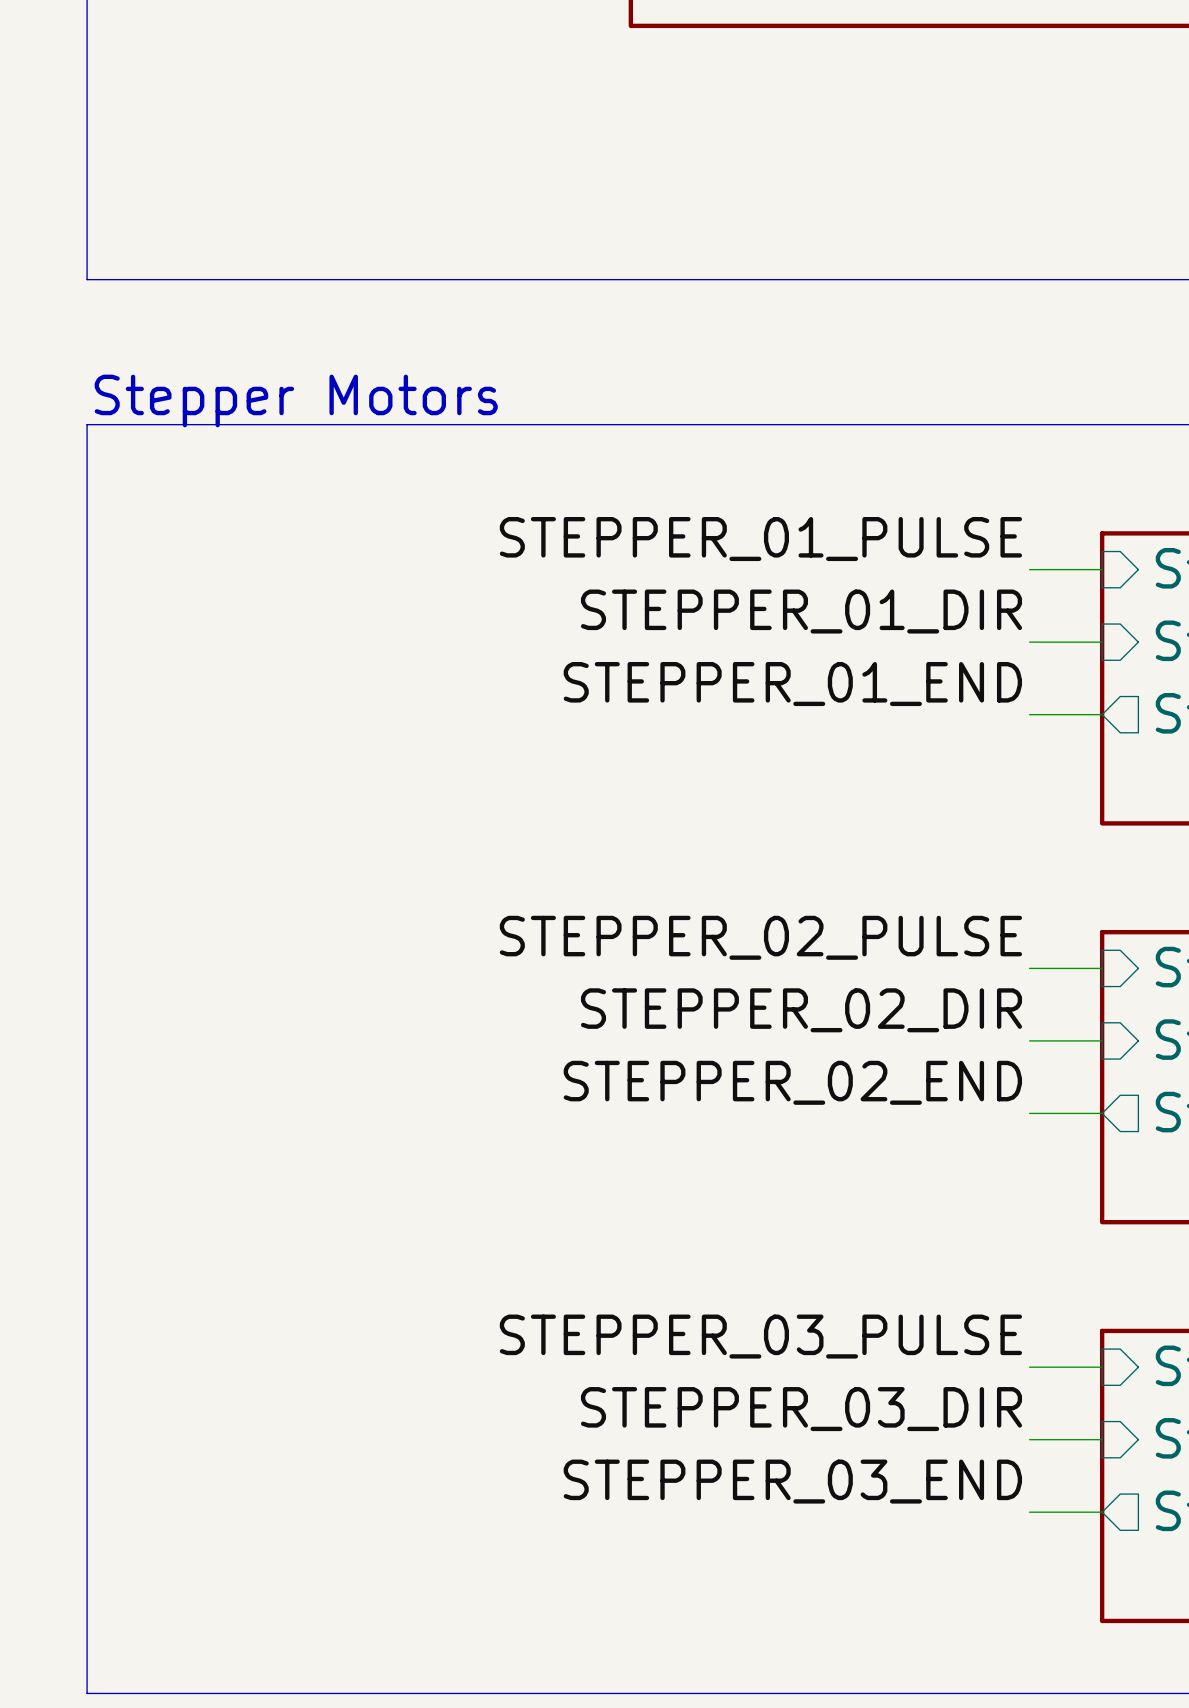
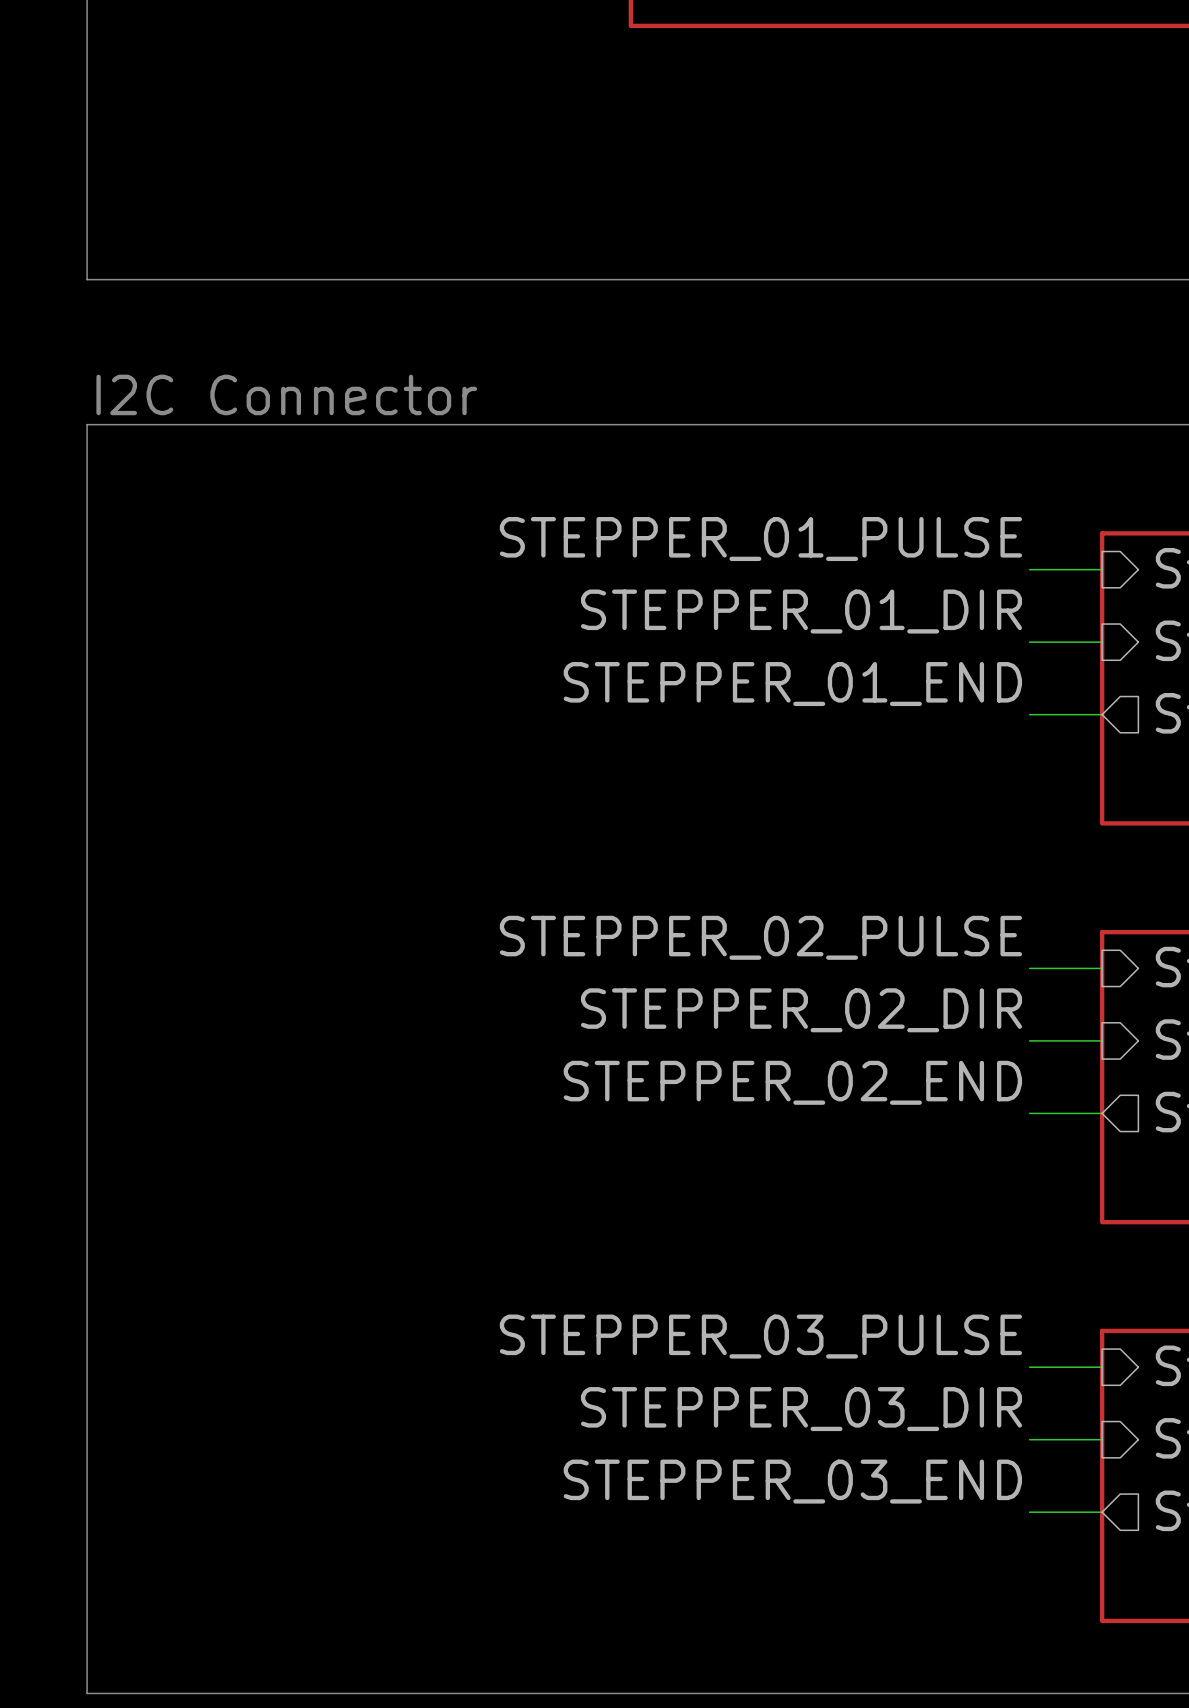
text: Stepper Motors (296, 400) -> I2C Connector (286, 394)

